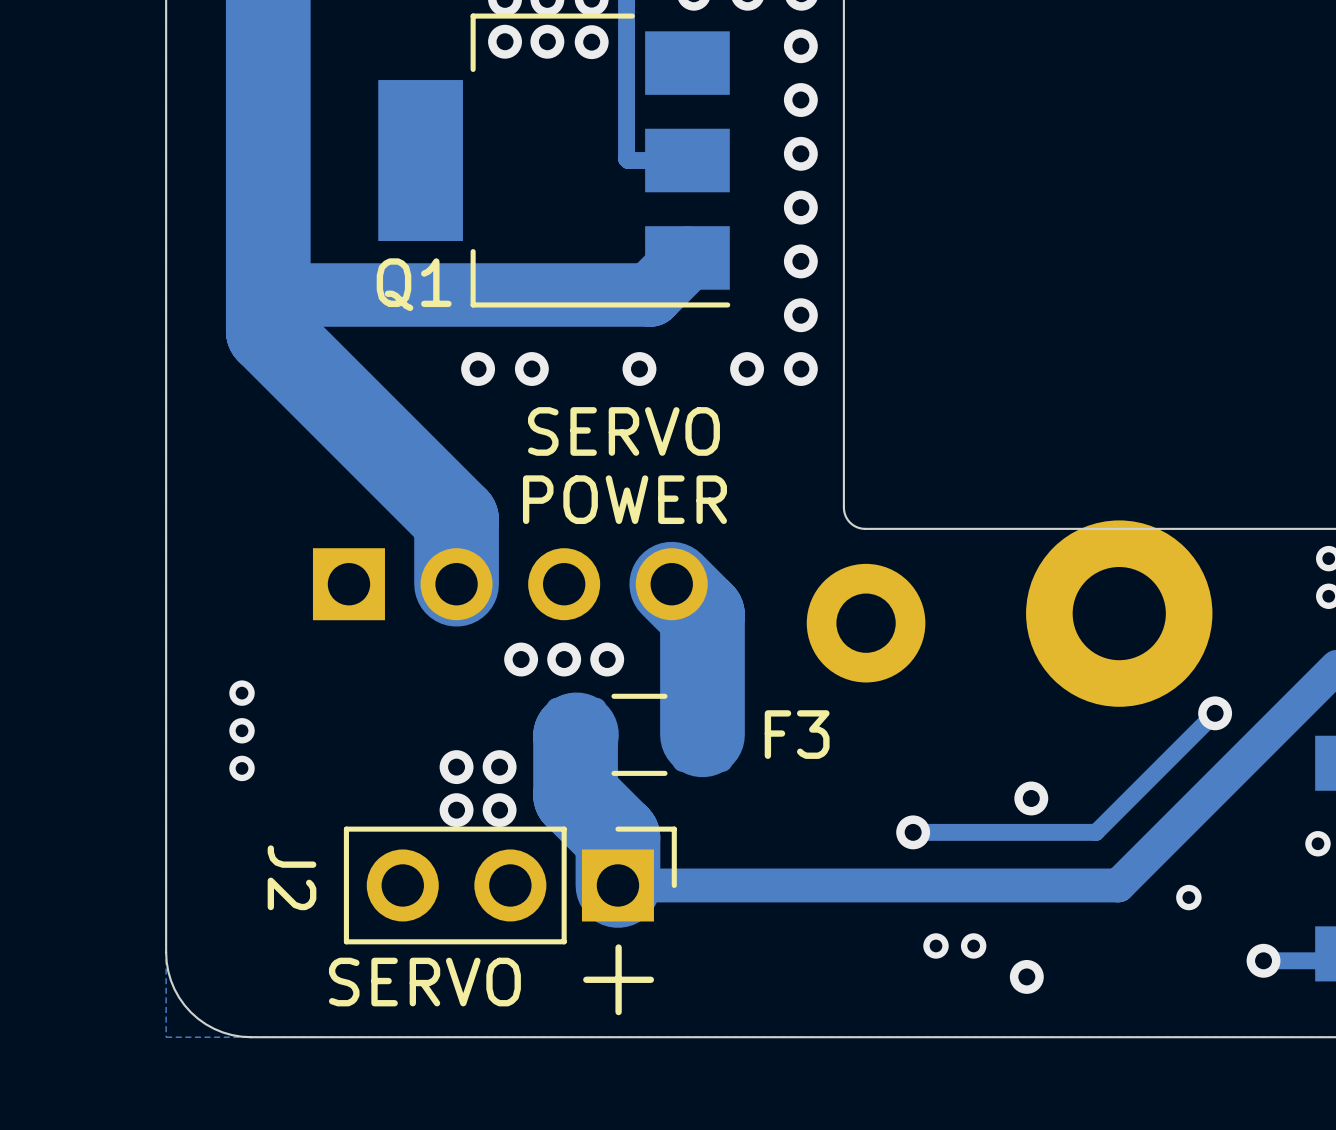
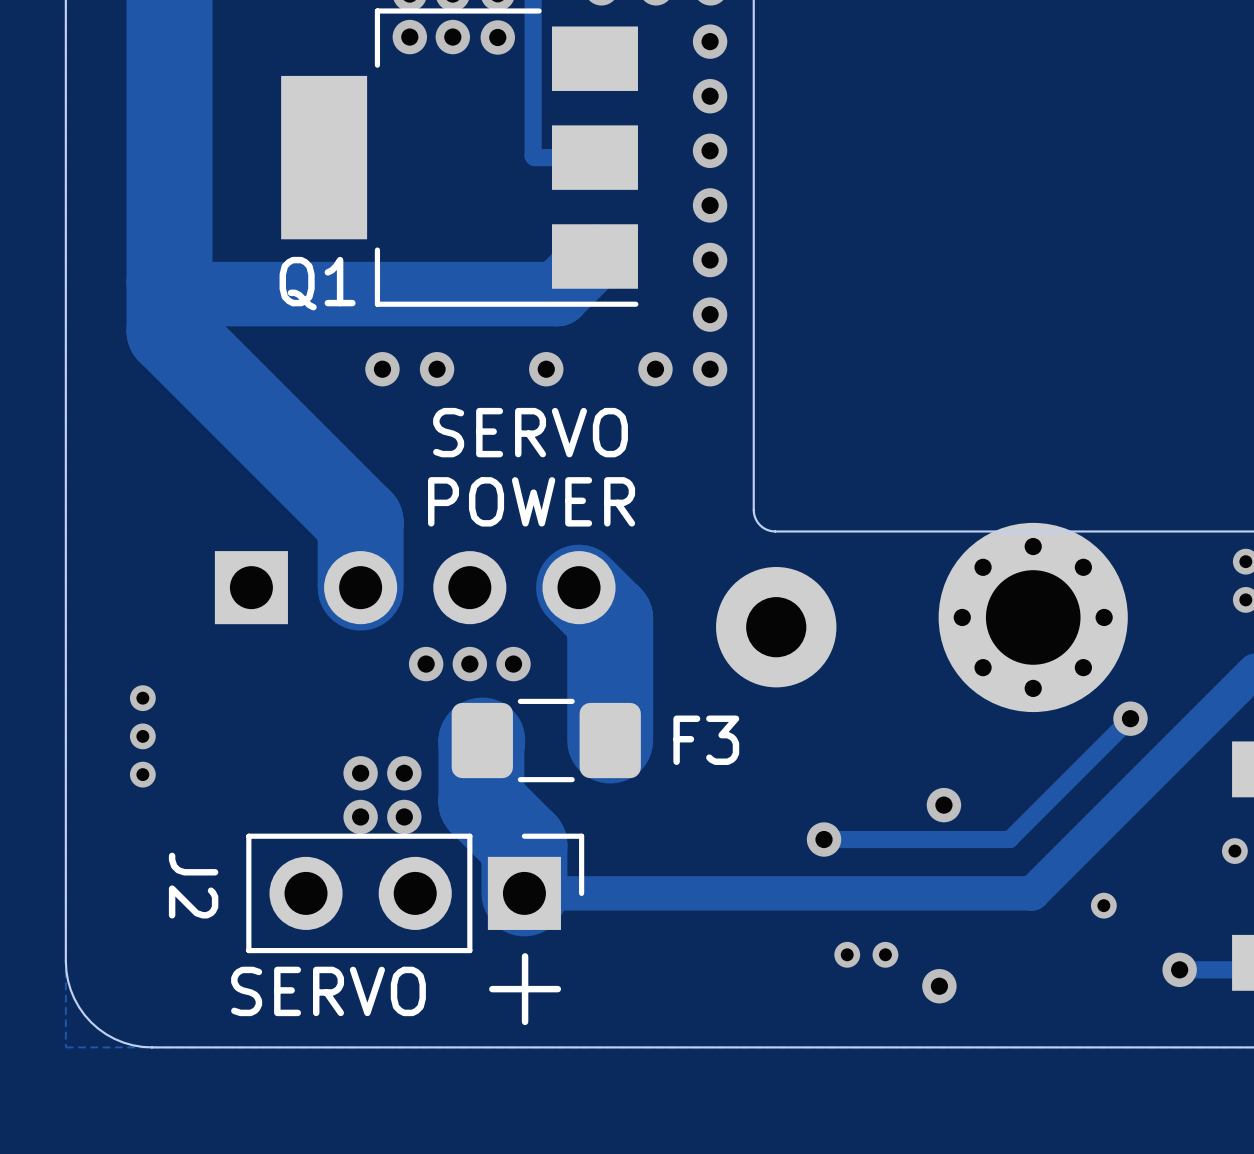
part footprint: [1026, 520, 1213, 707] -> [938, 522, 1128, 713]

